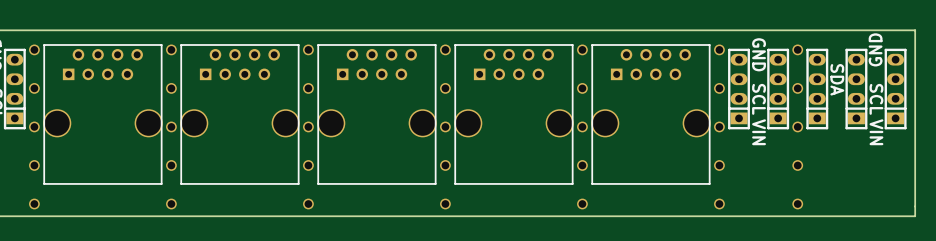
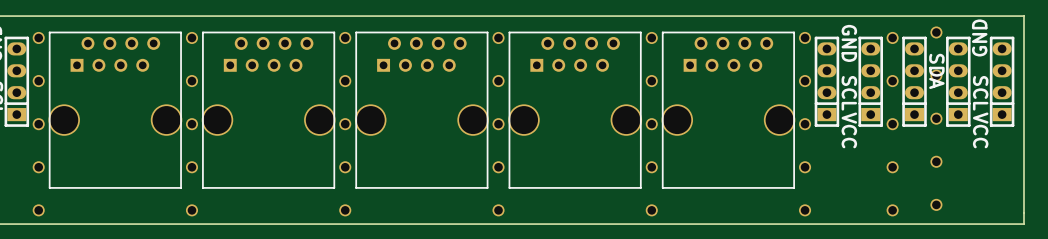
part: none -> (936, 32)
part: none -> (936, 75)
part: none -> (936, 118)
text: VIN (759, 132) -> VCC (849, 130)
text: VIN (876, 132) -> VCC (980, 130)
part: none -> (936, 161)
part: none -> (936, 204)

